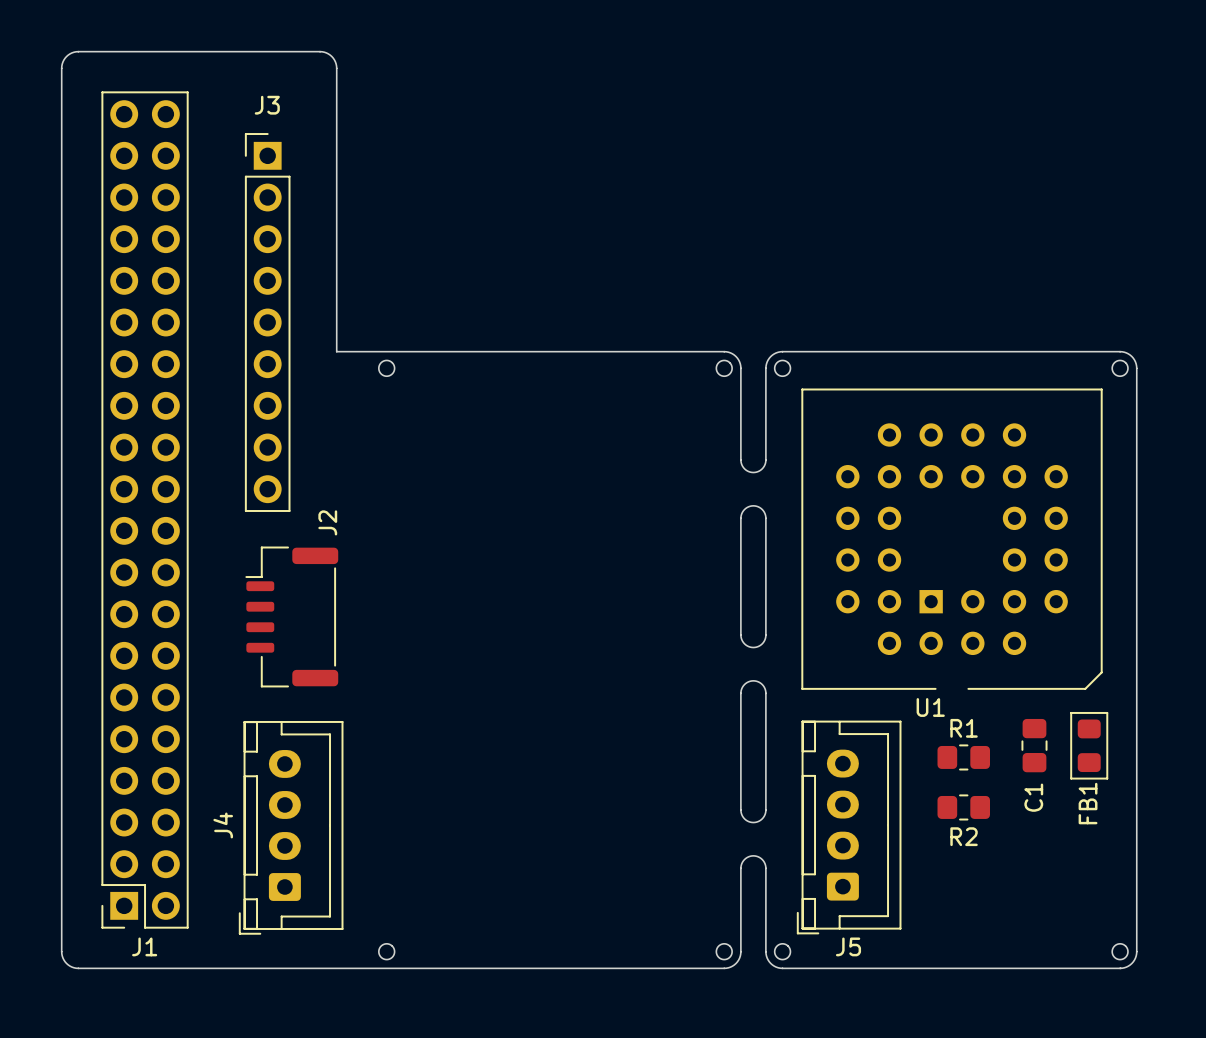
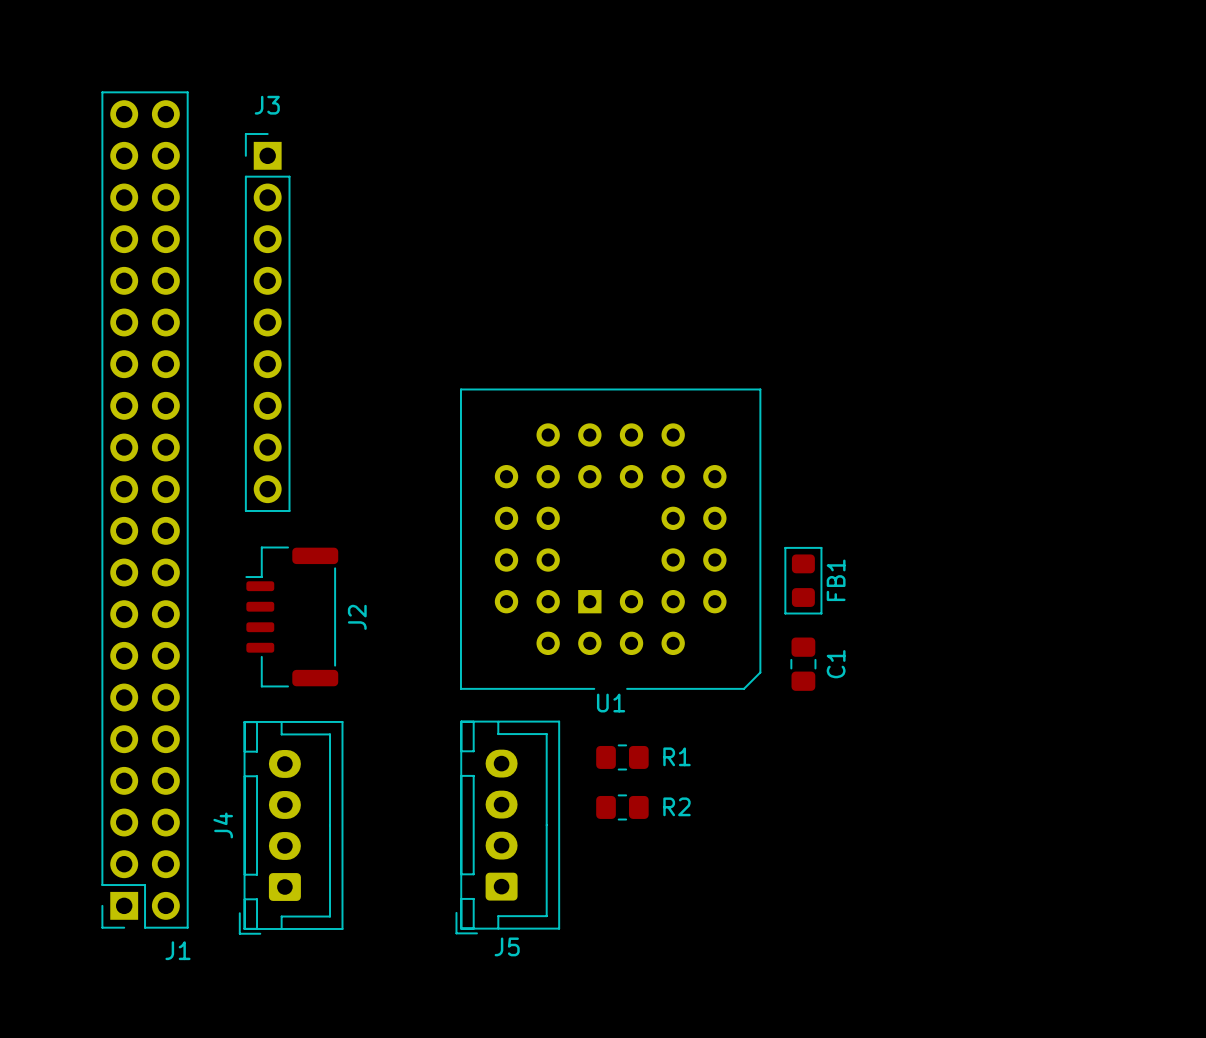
board edge: (392, 362) (386, 360) (380, 362) (378, 368) (381, 374) (386, 376) (392, 373) (394, 368) (392, 362) -> none
board edge: (729, 362) (723, 360) (718, 362) (716, 368) (718, 374) (724, 376) (729, 373) (732, 368) (729, 362) -> none
board edge: (787, 362) (782, 360) (776, 362) (774, 368) (777, 374) (782, 376) (788, 373) (790, 368) (788, 362) -> none
board edge: (1125, 362) (1119, 360) (1114, 362) (1112, 368) (1114, 374) (1120, 376) (1125, 373) (1127, 368) (1125, 362) -> none
board edge: (740, 518) (741, 636) (745, 644) (755, 647) (762, 643) (765, 636) (765, 516) (761, 508) (751, 505) (743, 510) (740, 518) -> none
J2 name position: J2 (327, 522) -> J2 (357, 617)
U1 position: (952, 539) -> (610, 539)
board edge: (740, 693) (741, 811) (745, 819) (755, 822) (762, 818) (765, 811) (765, 691) (762, 684) (753, 680) (744, 684) (740, 693) -> none
U1 name position: U1 (930, 707) -> U1 (611, 703)
R1 name position: R1 (964, 728) -> R1 (676, 756)
C1 position: (1034, 745) -> (803, 664)
FB1 position: (1089, 745) -> (803, 580)
R1 position: (963, 757) -> (622, 757)
C1 name position: C1 (1033, 797) -> C1 (836, 664)
FB1 name position: FB1 (1088, 803) -> FB1 (836, 580)
R2 position: (963, 807) -> (622, 807)
J5 position: (849, 827) -> (507, 827)
R2 name position: R2 (964, 836) -> R2 (676, 806)
board edge: (392, 945) (386, 943) (380, 946) (378, 951) (381, 957) (386, 959) (392, 957) (394, 951) (392, 946) -> none
board edge: (729, 945) (723, 943) (718, 946) (716, 951) (718, 957) (724, 959) (729, 957) (732, 951) (729, 946) -> none
board edge: (787, 945) (782, 943) (776, 946) (774, 951) (777, 957) (782, 959) (788, 957) (790, 951) (788, 946) -> none
board edge: (1125, 945) (1119, 943) (1114, 946) (1112, 951) (1114, 957) (1120, 959) (1125, 957) (1127, 951) (1125, 946) -> none
J1 name position: J1 (144, 946) -> J1 (177, 950)
board edge: (1120, 968) (1122, 968) (1124, 967) (1126, 967) (1131, 963) (1136, 951) (1136, 368) (1134, 360) (1130, 355) (1120, 351) (778, 352) (769, 358) (766, 366) (765, 463) (759, 470) (750, 472) (743, 467) (741, 461) (740, 366) (736, 356) (728, 352) (336, 351) (336, 68) (334, 59) (328, 53) (320, 51) (78, 51) (71, 52) (65, 58) (61, 68) (61, 951) (62, 958) (68, 964) (78, 968) (726, 968) (734, 964) (740, 956) (741, 866) (745, 858) (753, 855) (761, 858) (765, 865) (766, 953) (769, 961) (778, 967) (782, 968) (1120, 968) -> none

